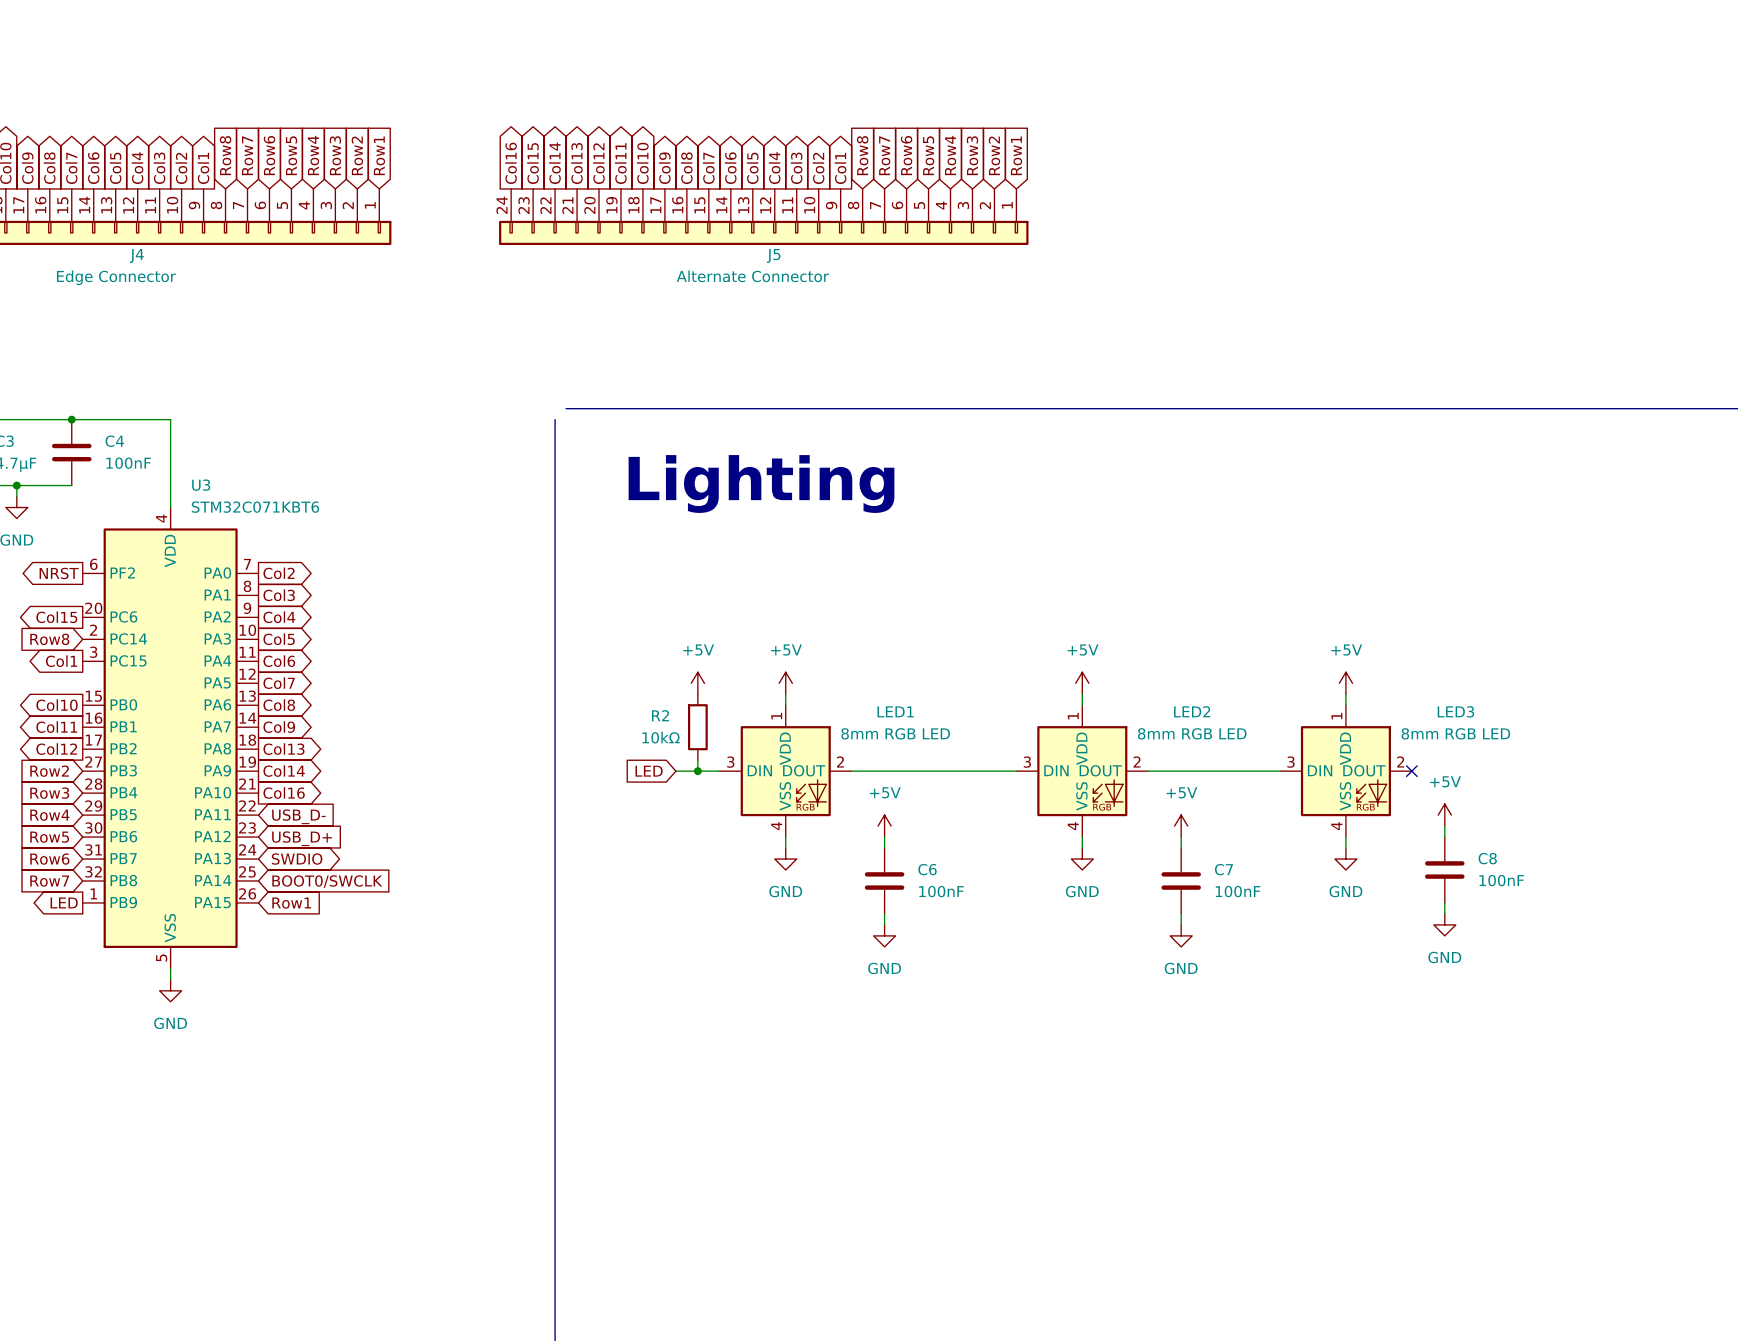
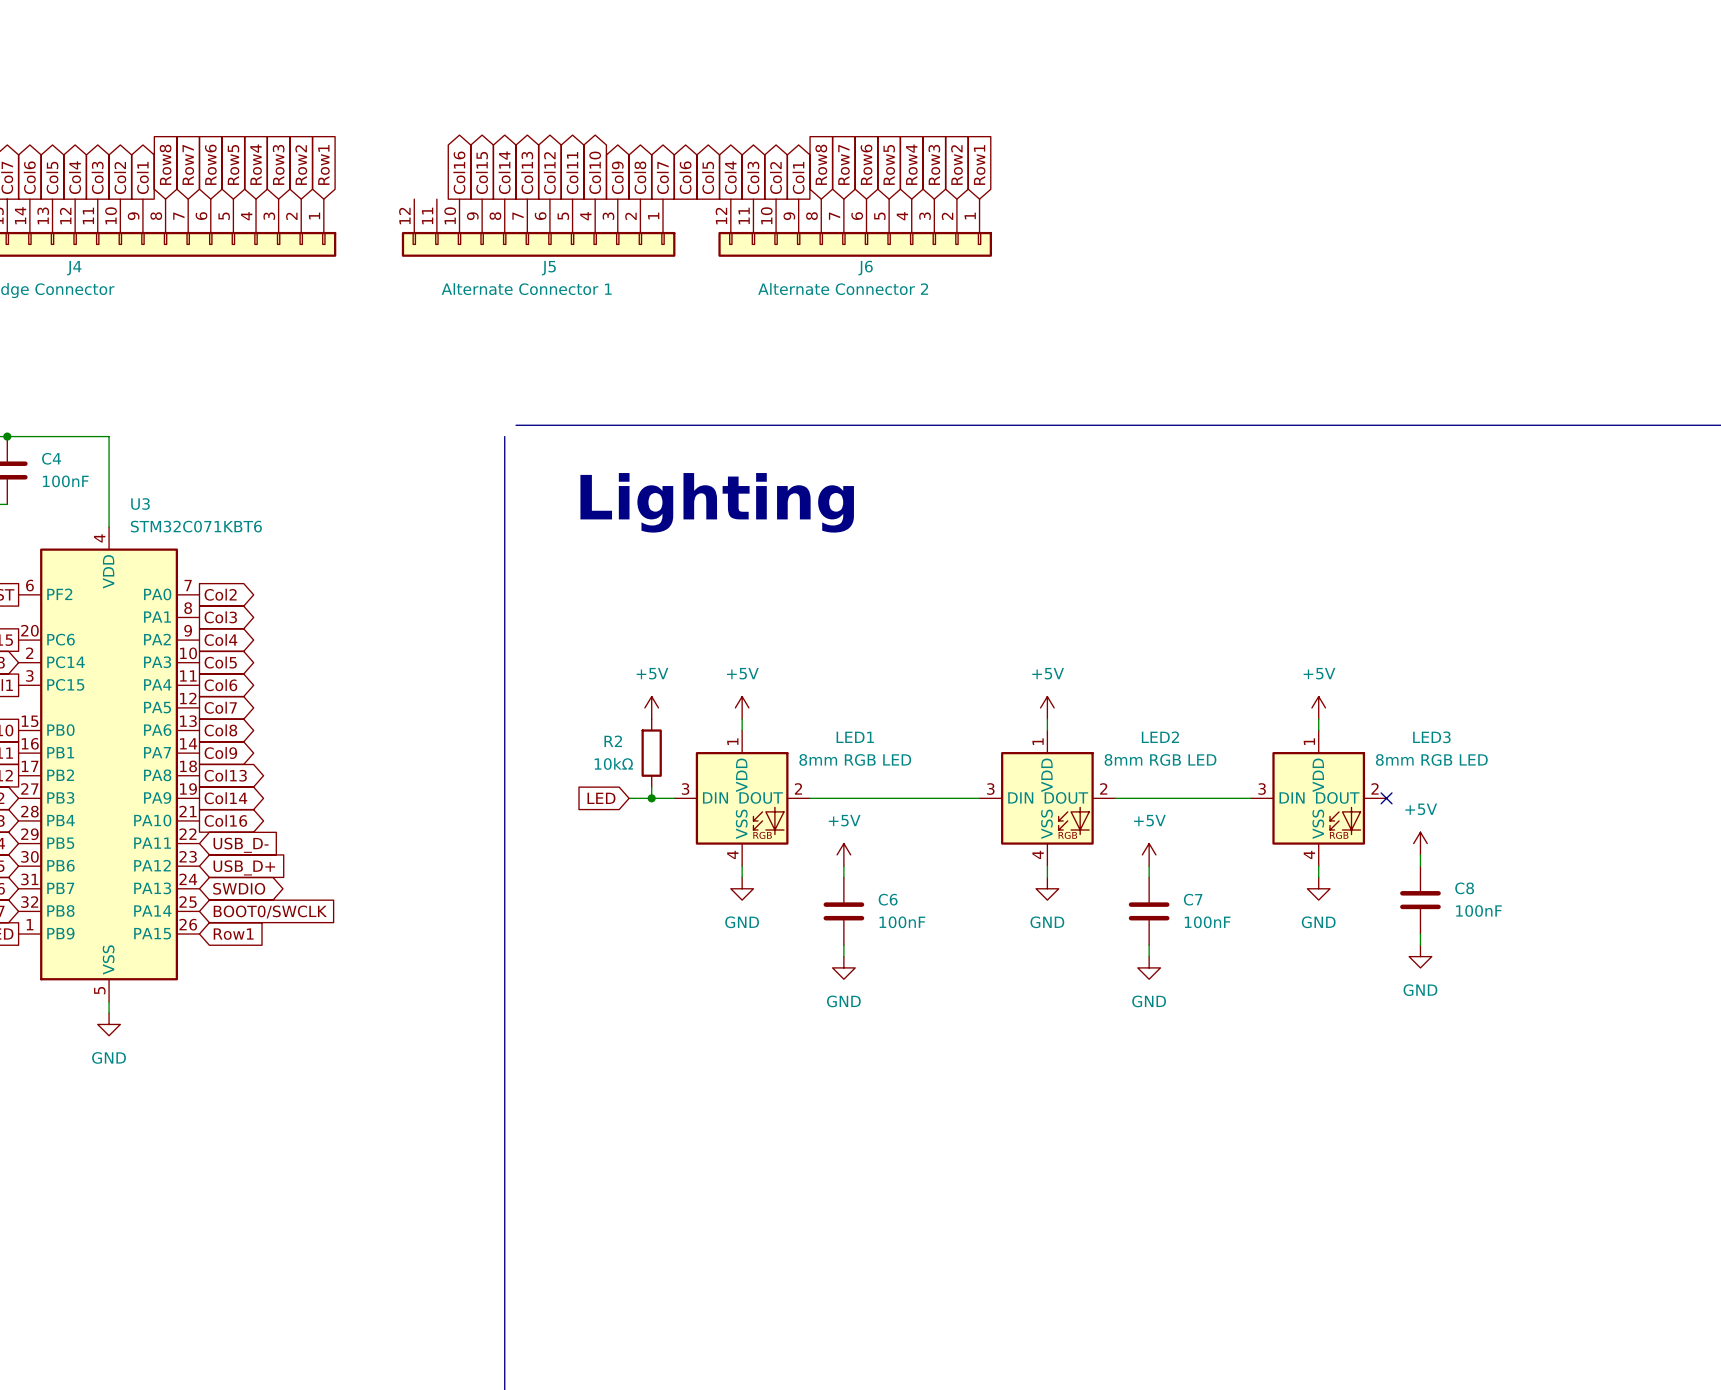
J5 symbol: [499, 188, 1029, 246] -> [401, 199, 676, 257]
J6: none -> Alternate Connector 2 (855, 227)
J5 value: Alternate Connector (752, 276) -> Alternate Connector 1 (526, 289)

